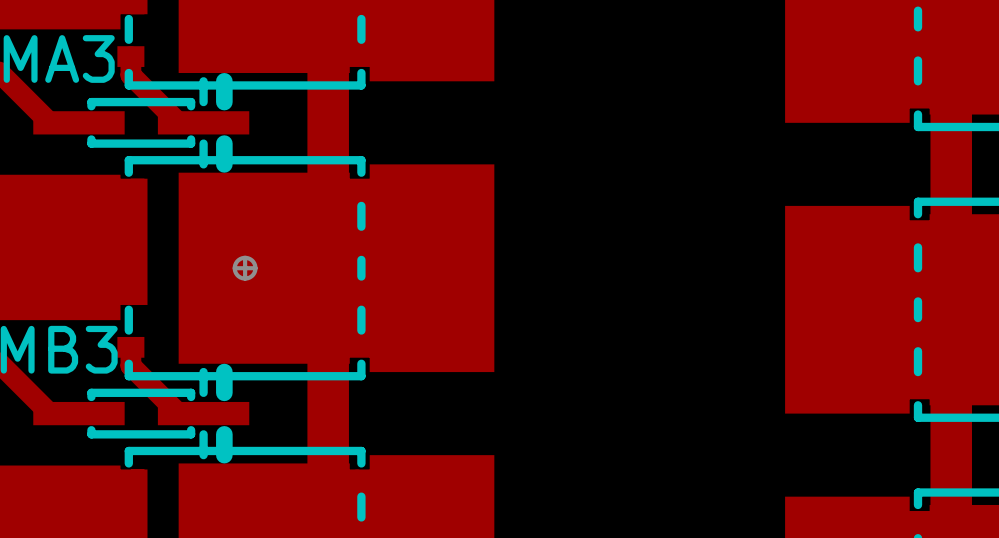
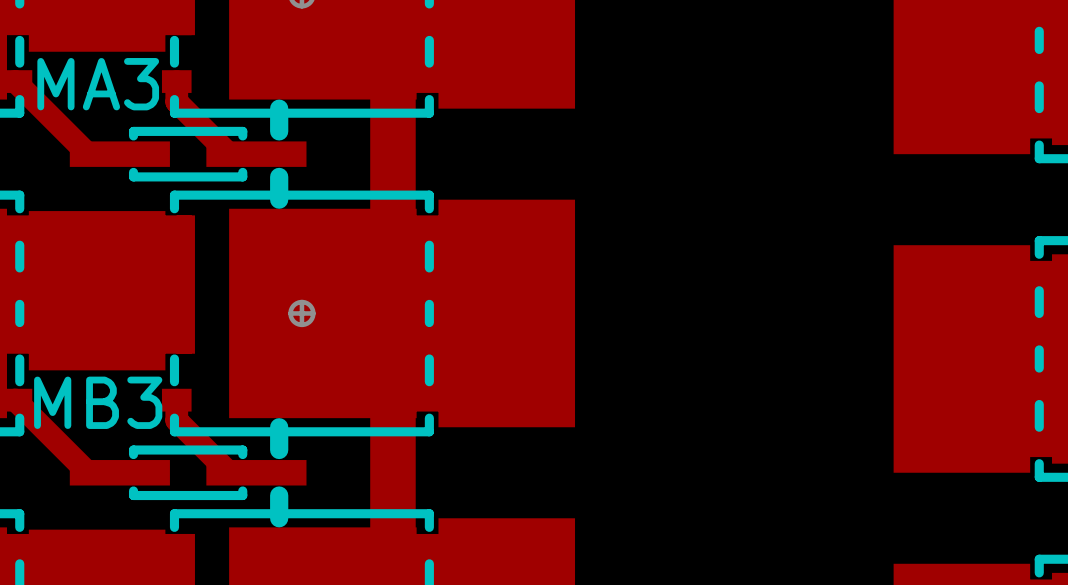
line: (203, 81) (203, 102) -> none
line: (203, 143) (203, 164) -> none
line: (203, 372) (203, 392) -> none
line: (203, 434) (203, 455) -> none

